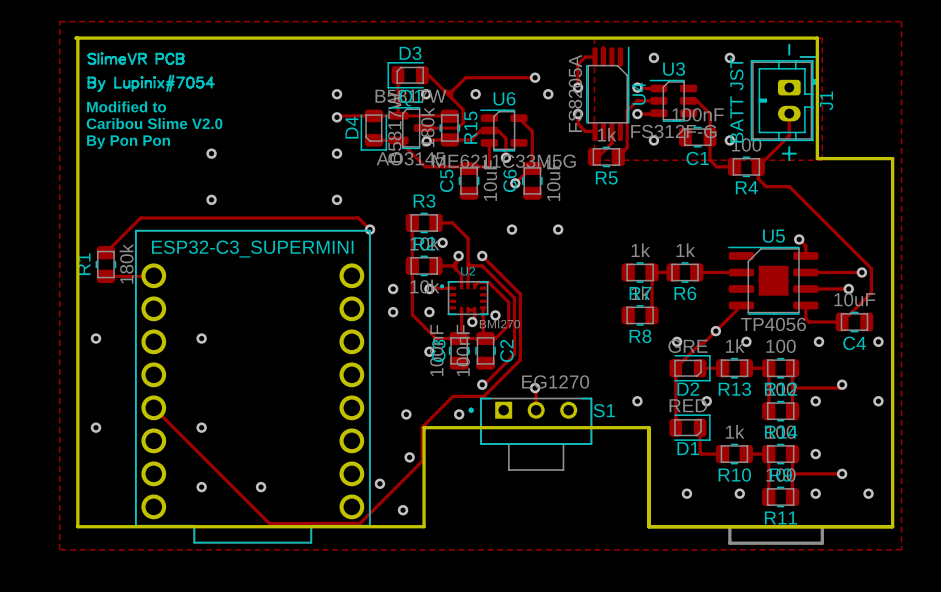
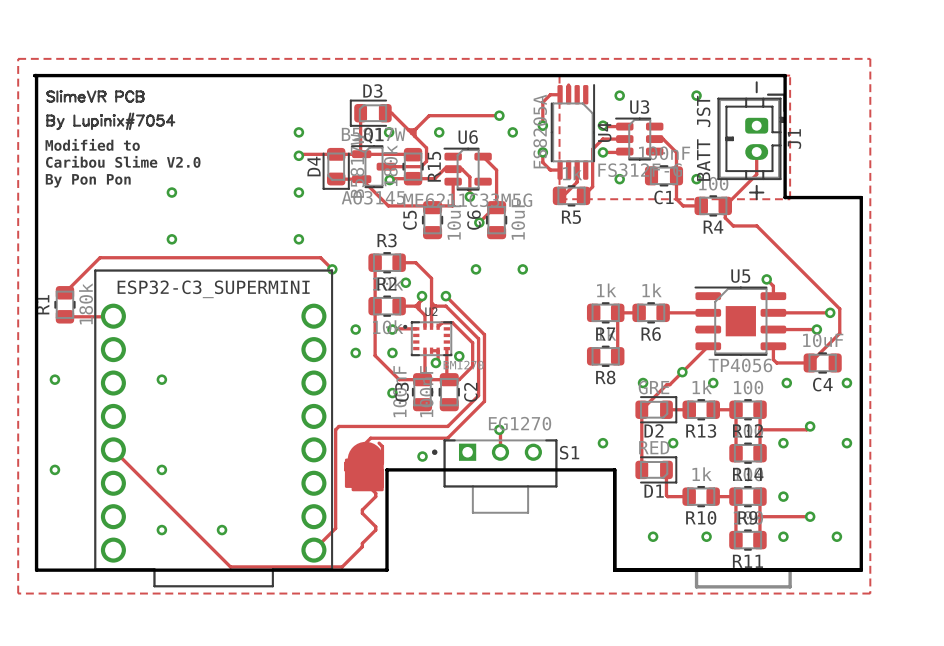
track: none -> (445, 426) (338, 426) (335, 429) (335, 528) (313, 550)
via: (482, 384) -> none
track: (453, 396) (422, 427) (422, 461) (360, 523) -> (362, 476) (362, 479) (375, 493) (375, 496) (362, 510) (362, 513) (375, 526) (375, 530) (342, 566) (322, 566)
track: none -> (416, 438) (370, 438) (345, 463) (345, 469) (352, 476) (369, 476) (382, 463) (382, 446) (379, 443)
drawing: none -> [344, 441, 384, 492]
via: (406, 414) -> none
via: (409, 457) -> none
via: (379, 483) -> none
via: (403, 510) -> none

